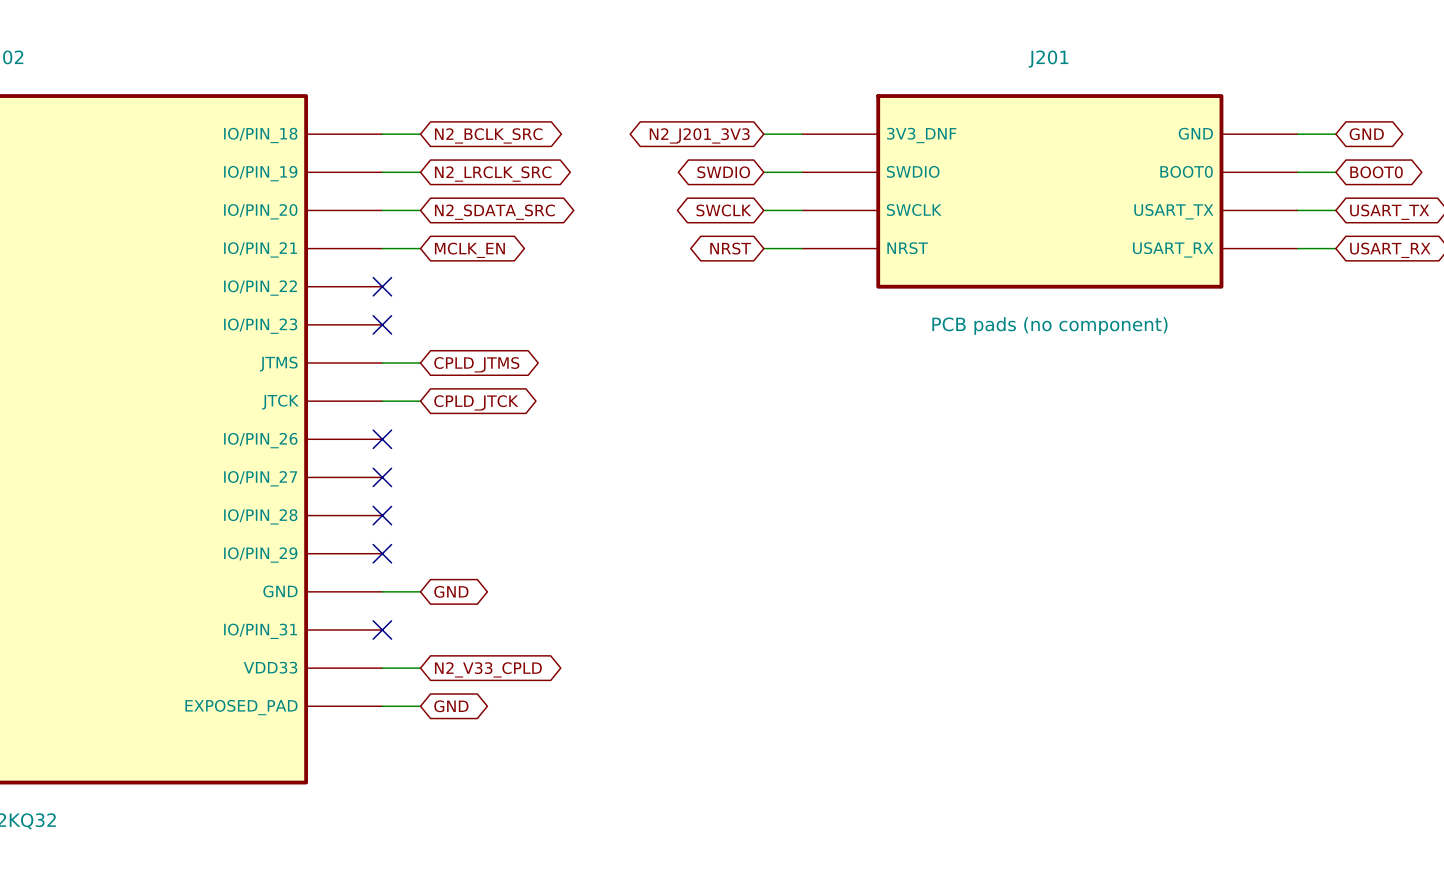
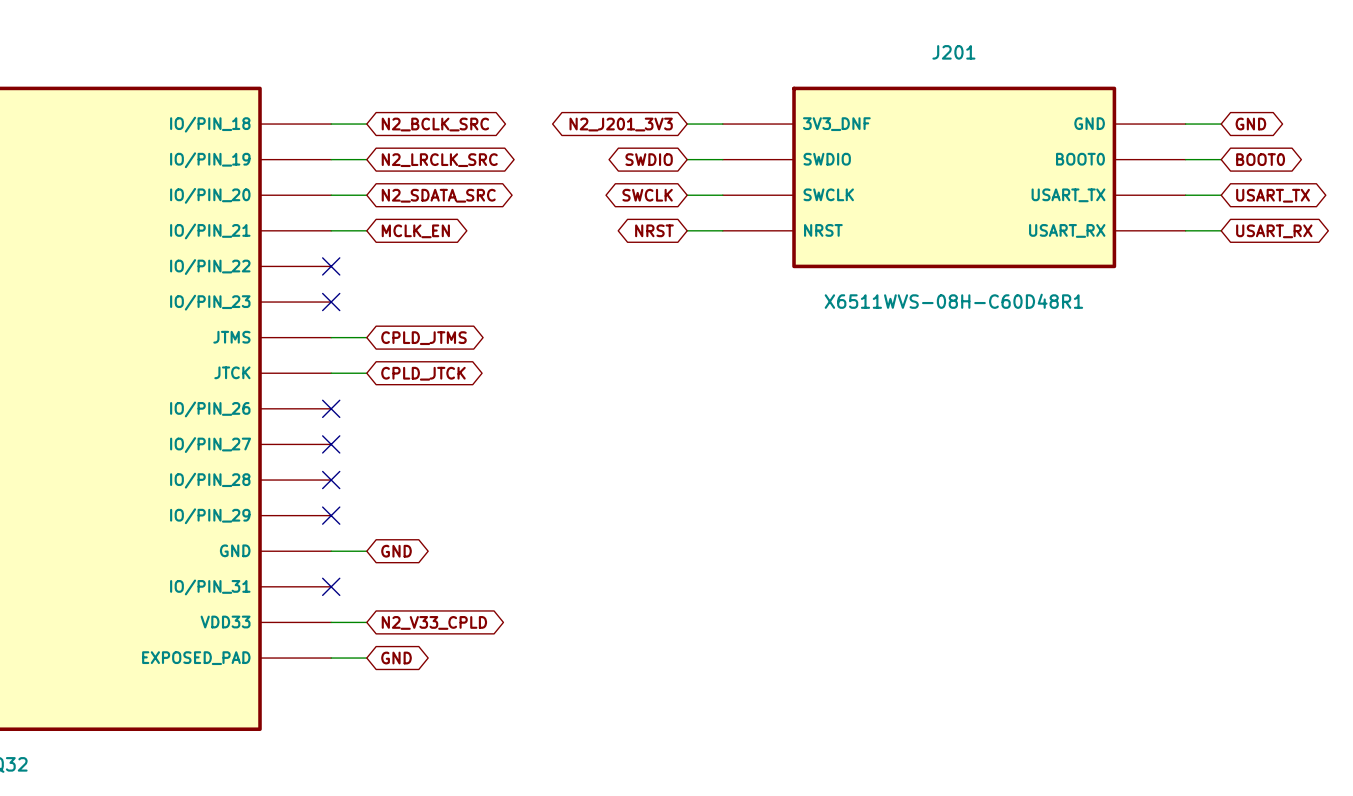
J201 value: PCB pads (no component) (1049, 325) -> X6511WVS-08H-C60D48R1 (953, 301)

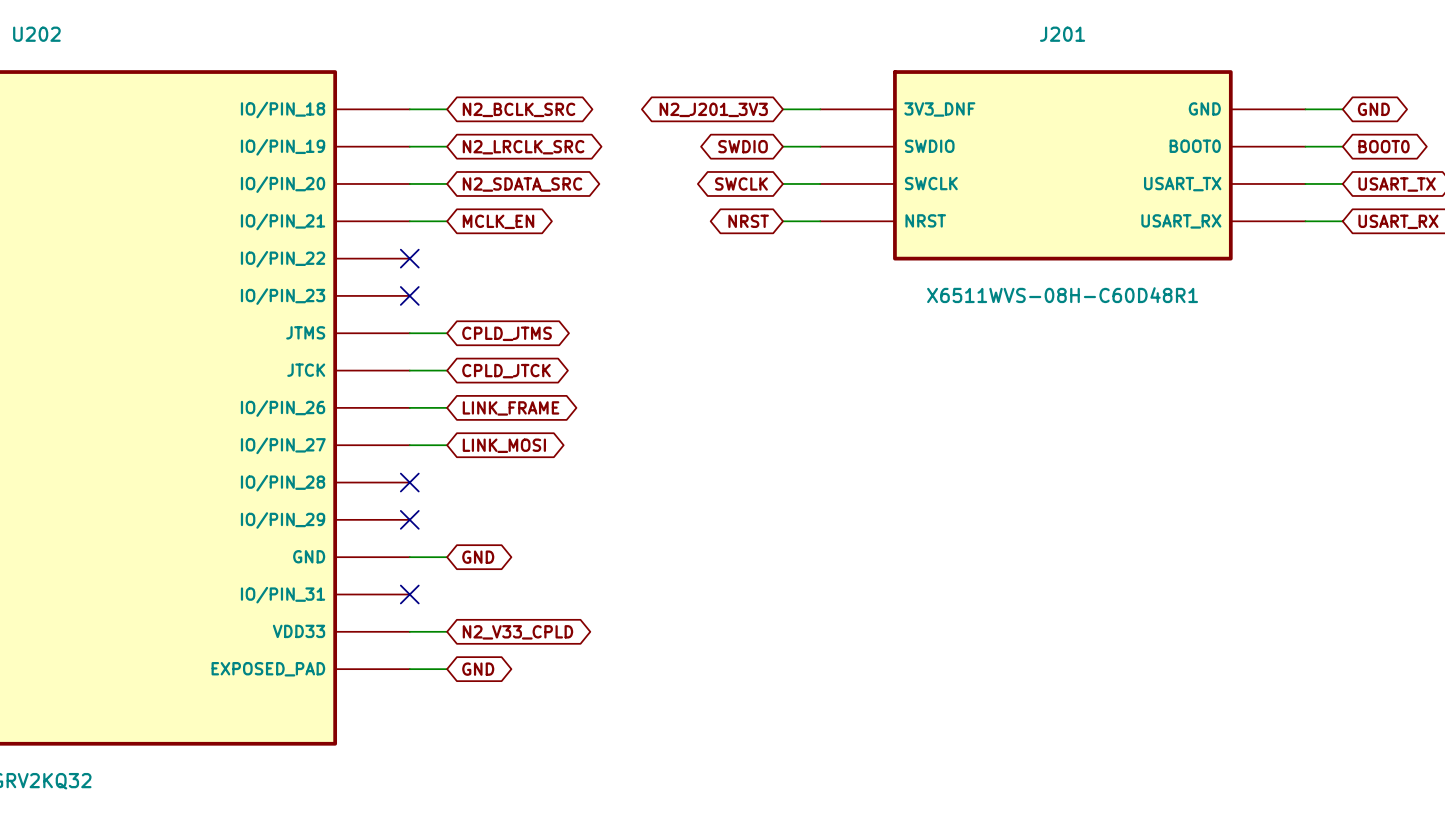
wire: none -> (409, 407) (447, 407)
no-connect mark: (331, 408) -> none
global label: none -> LINK_FRAME (511, 408)
wire: none -> (409, 445) (447, 445)
no-connect mark: (331, 444) -> none
global label: none -> LINK_MOSI (504, 445)

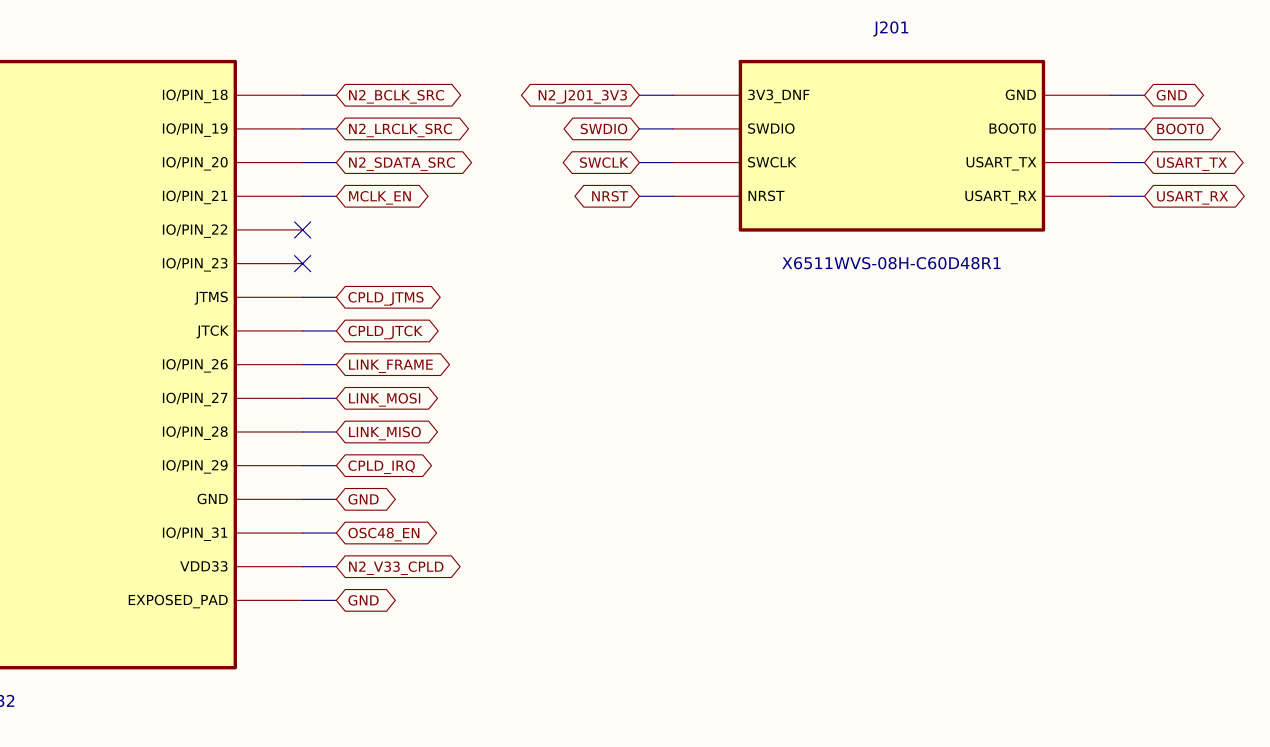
wire: none -> (302, 431) (336, 431)
no-connect mark: (409, 482) -> none
global label: none -> LINK_MISO (384, 433)
wire: none -> (302, 465) (336, 465)
no-connect mark: (409, 519) -> none
global label: none -> CPLD_IRQ (381, 467)
wire: none -> (302, 533) (336, 533)
no-connect mark: (409, 594) -> none
global label: none -> OSC48_EN (383, 534)

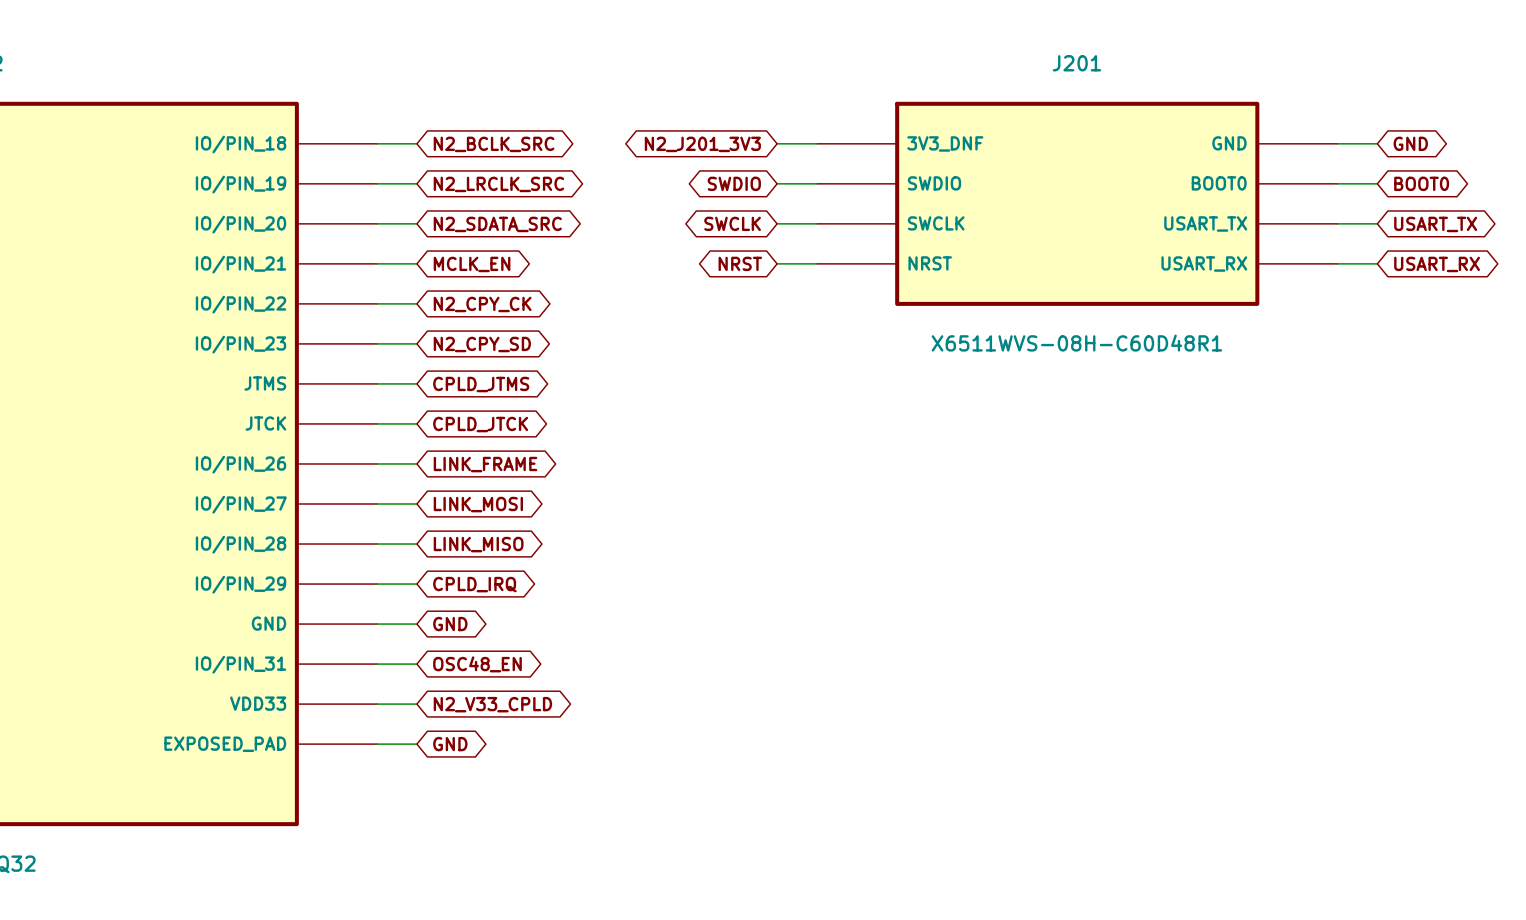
wire: none -> (376, 303) (416, 303)
no-connect mark: (302, 229) -> none
global label: none -> N2_CPY_CK (482, 304)
wire: none -> (376, 343) (416, 343)
no-connect mark: (302, 263) -> none
global label: none -> N2_CPY_SD (482, 344)

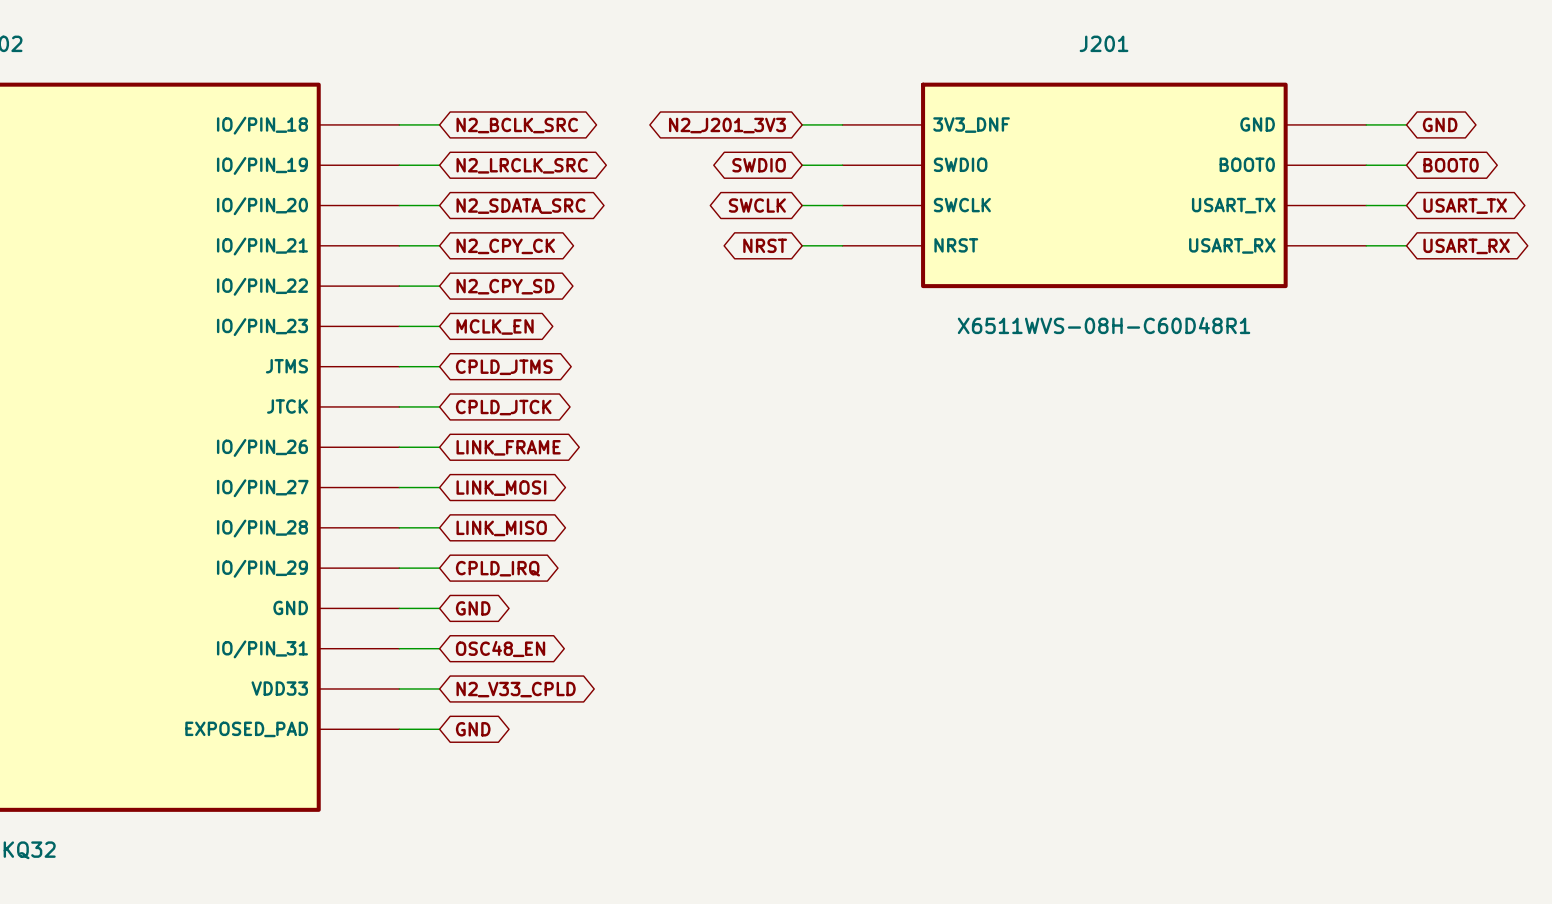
global label: MCLK_EN (472, 264) -> N2_CPY_CK (505, 246)
global label: N2_CPY_CK (482, 304) -> N2_CPY_SD (505, 286)
global label: N2_CPY_SD (482, 344) -> MCLK_EN (495, 326)

